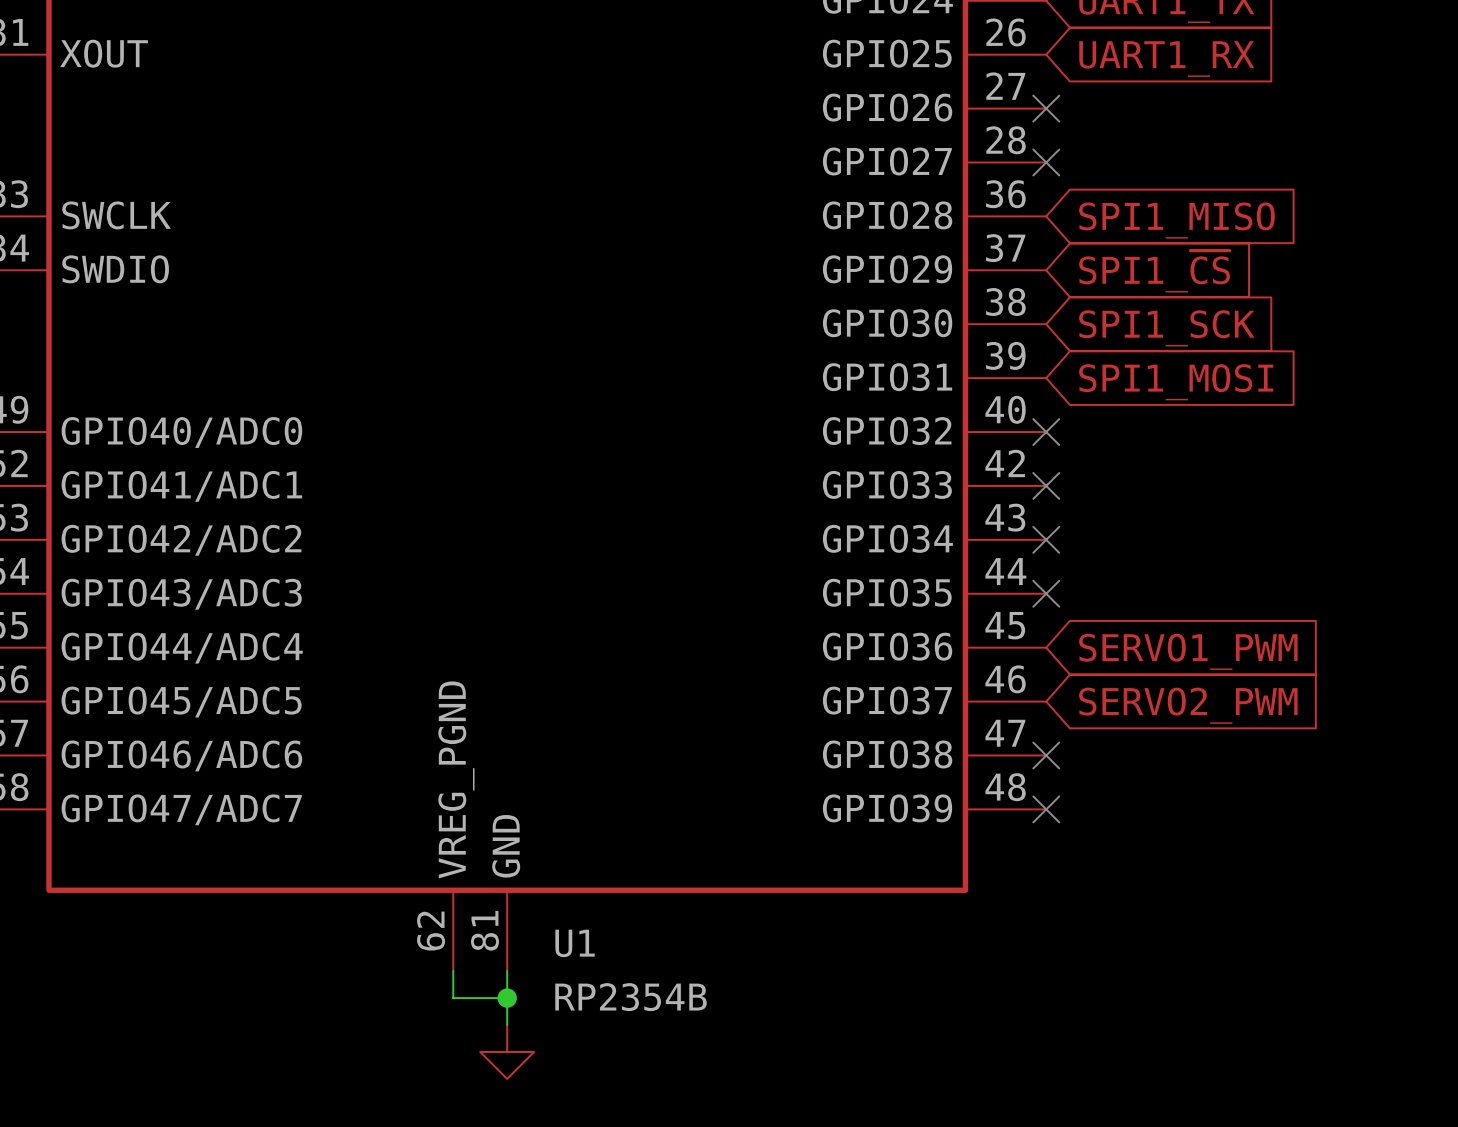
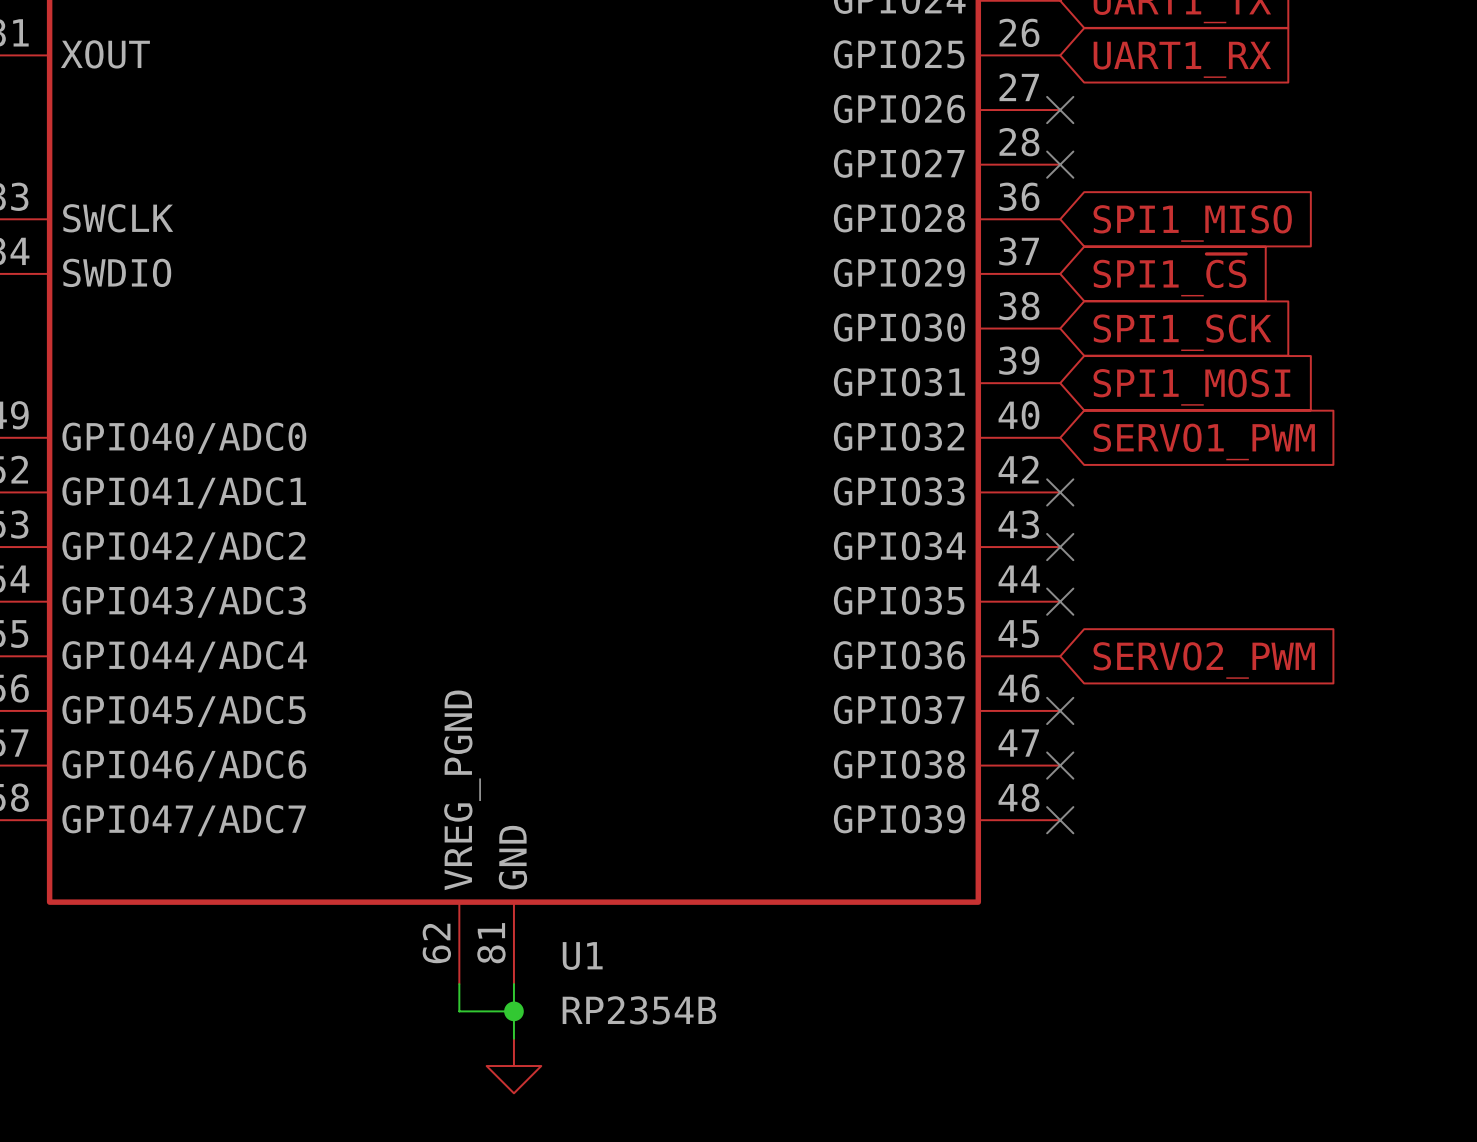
no-connect mark: (1046, 432) -> none
global label: none -> SERVO1_PWM (1204, 441)
global label: SERVO1_PWM (1188, 651) -> SERVO2_PWM (1204, 660)
no-connect mark: none -> (1060, 710)
global label: SERVO2_PWM (1188, 705) -> none

